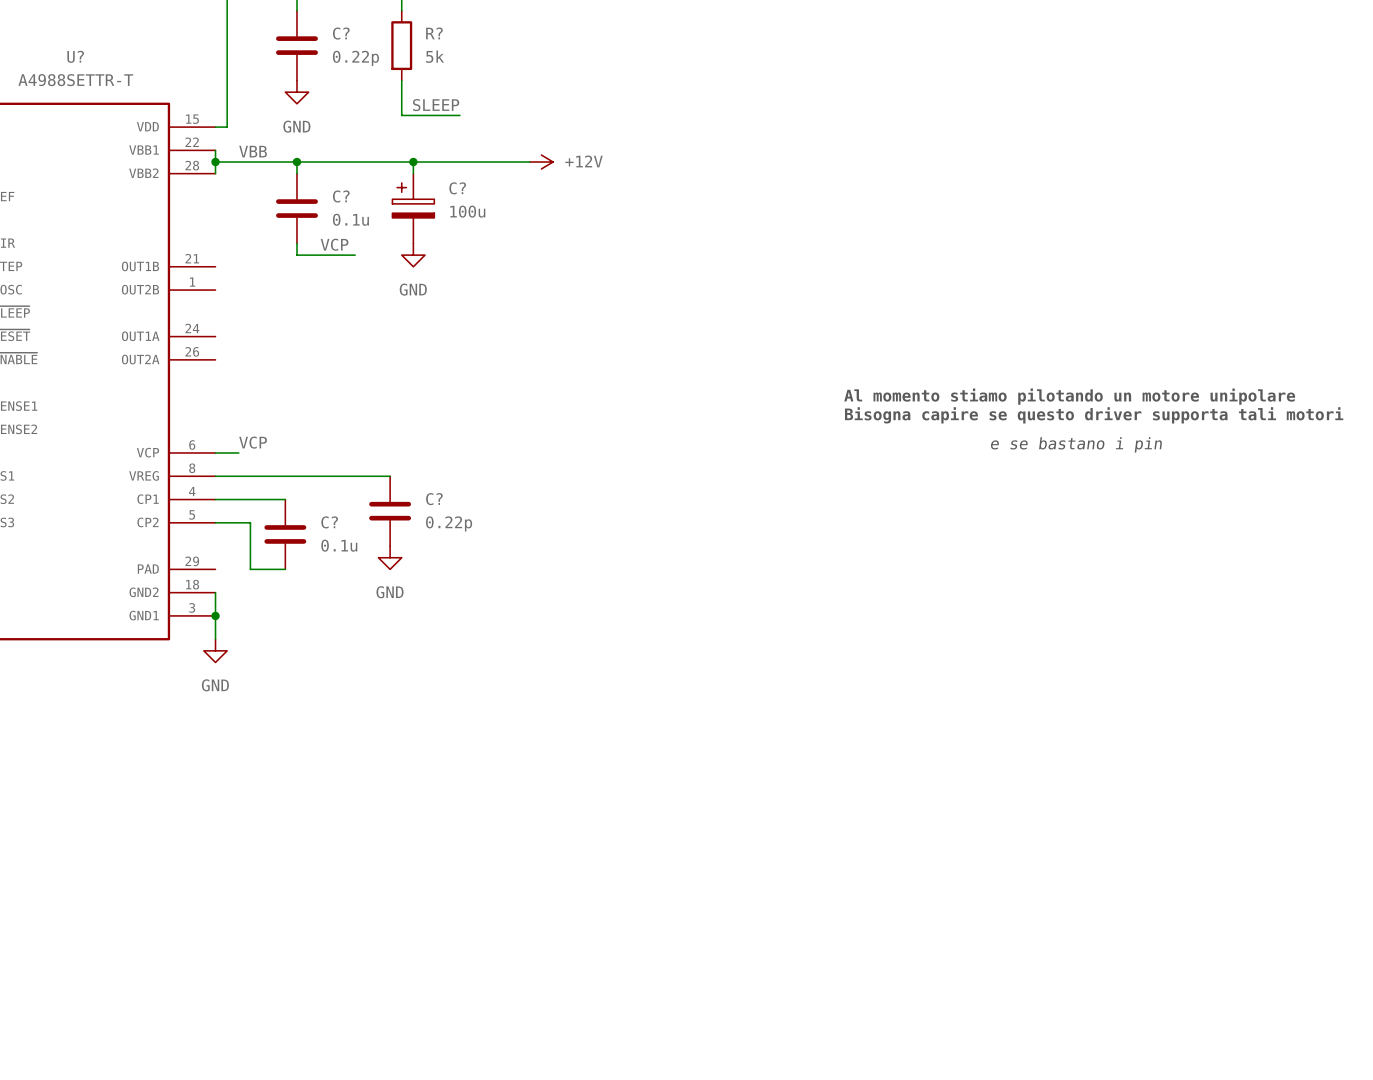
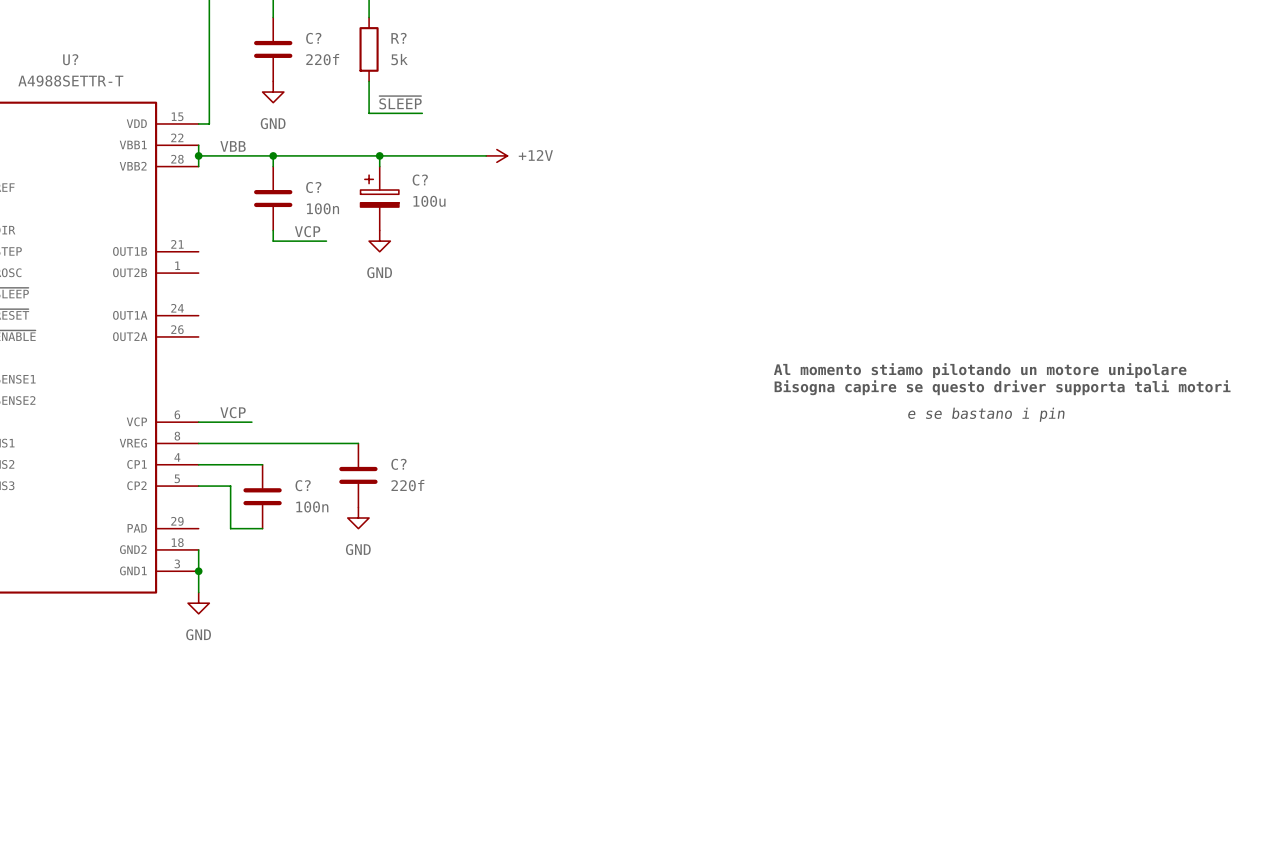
C? value: 0.22p (355, 58) -> 220f (322, 59)
label: SLEEP (436, 105) -> ~{SLEEP} (400, 102)
C? value: 0.1u (350, 219) -> 100n (322, 208)
wire: none -> (219, 422) (251, 422)
C? value: 0.22p (449, 523) -> 220f (407, 485)
C? value: 0.1u (339, 545) -> 100n (312, 506)

